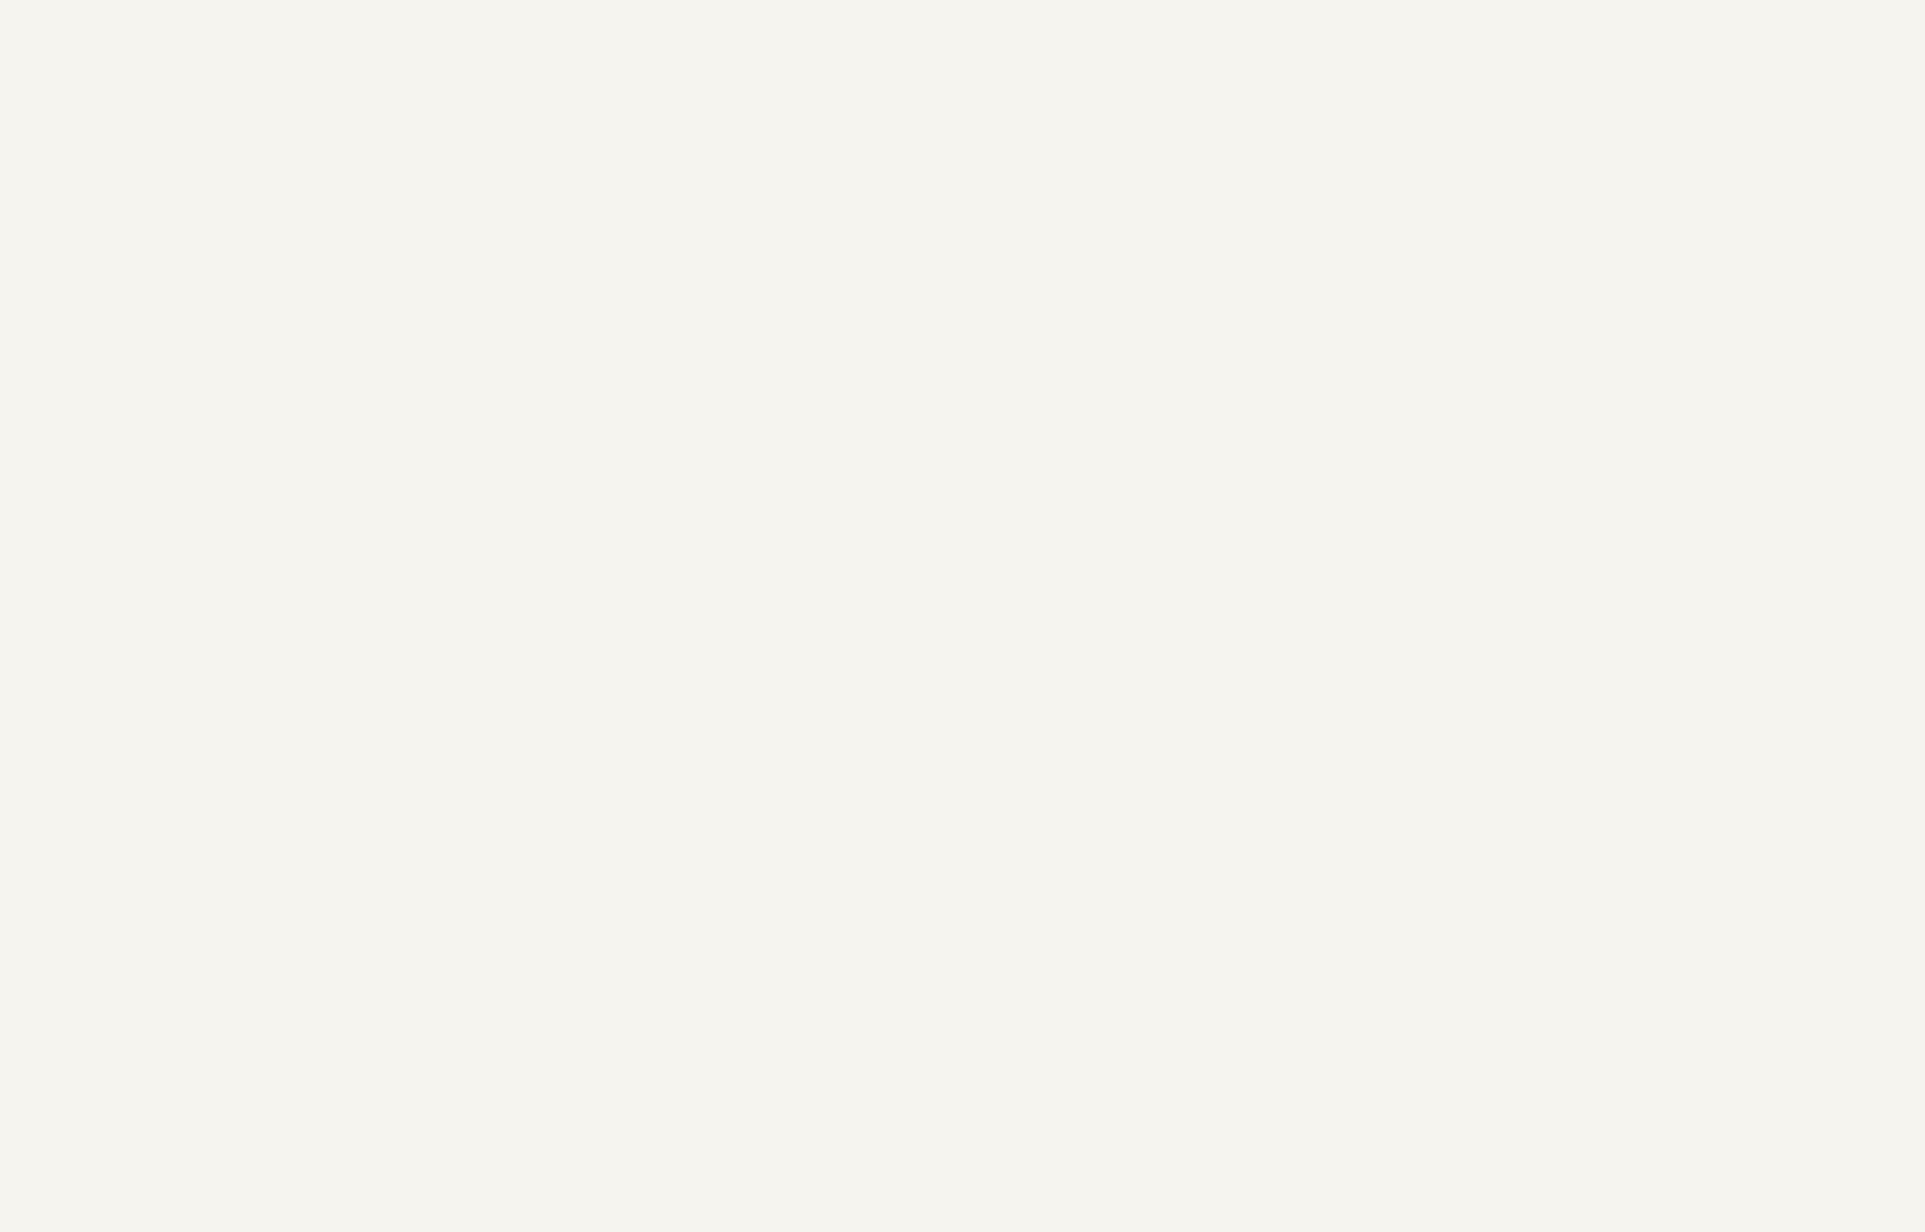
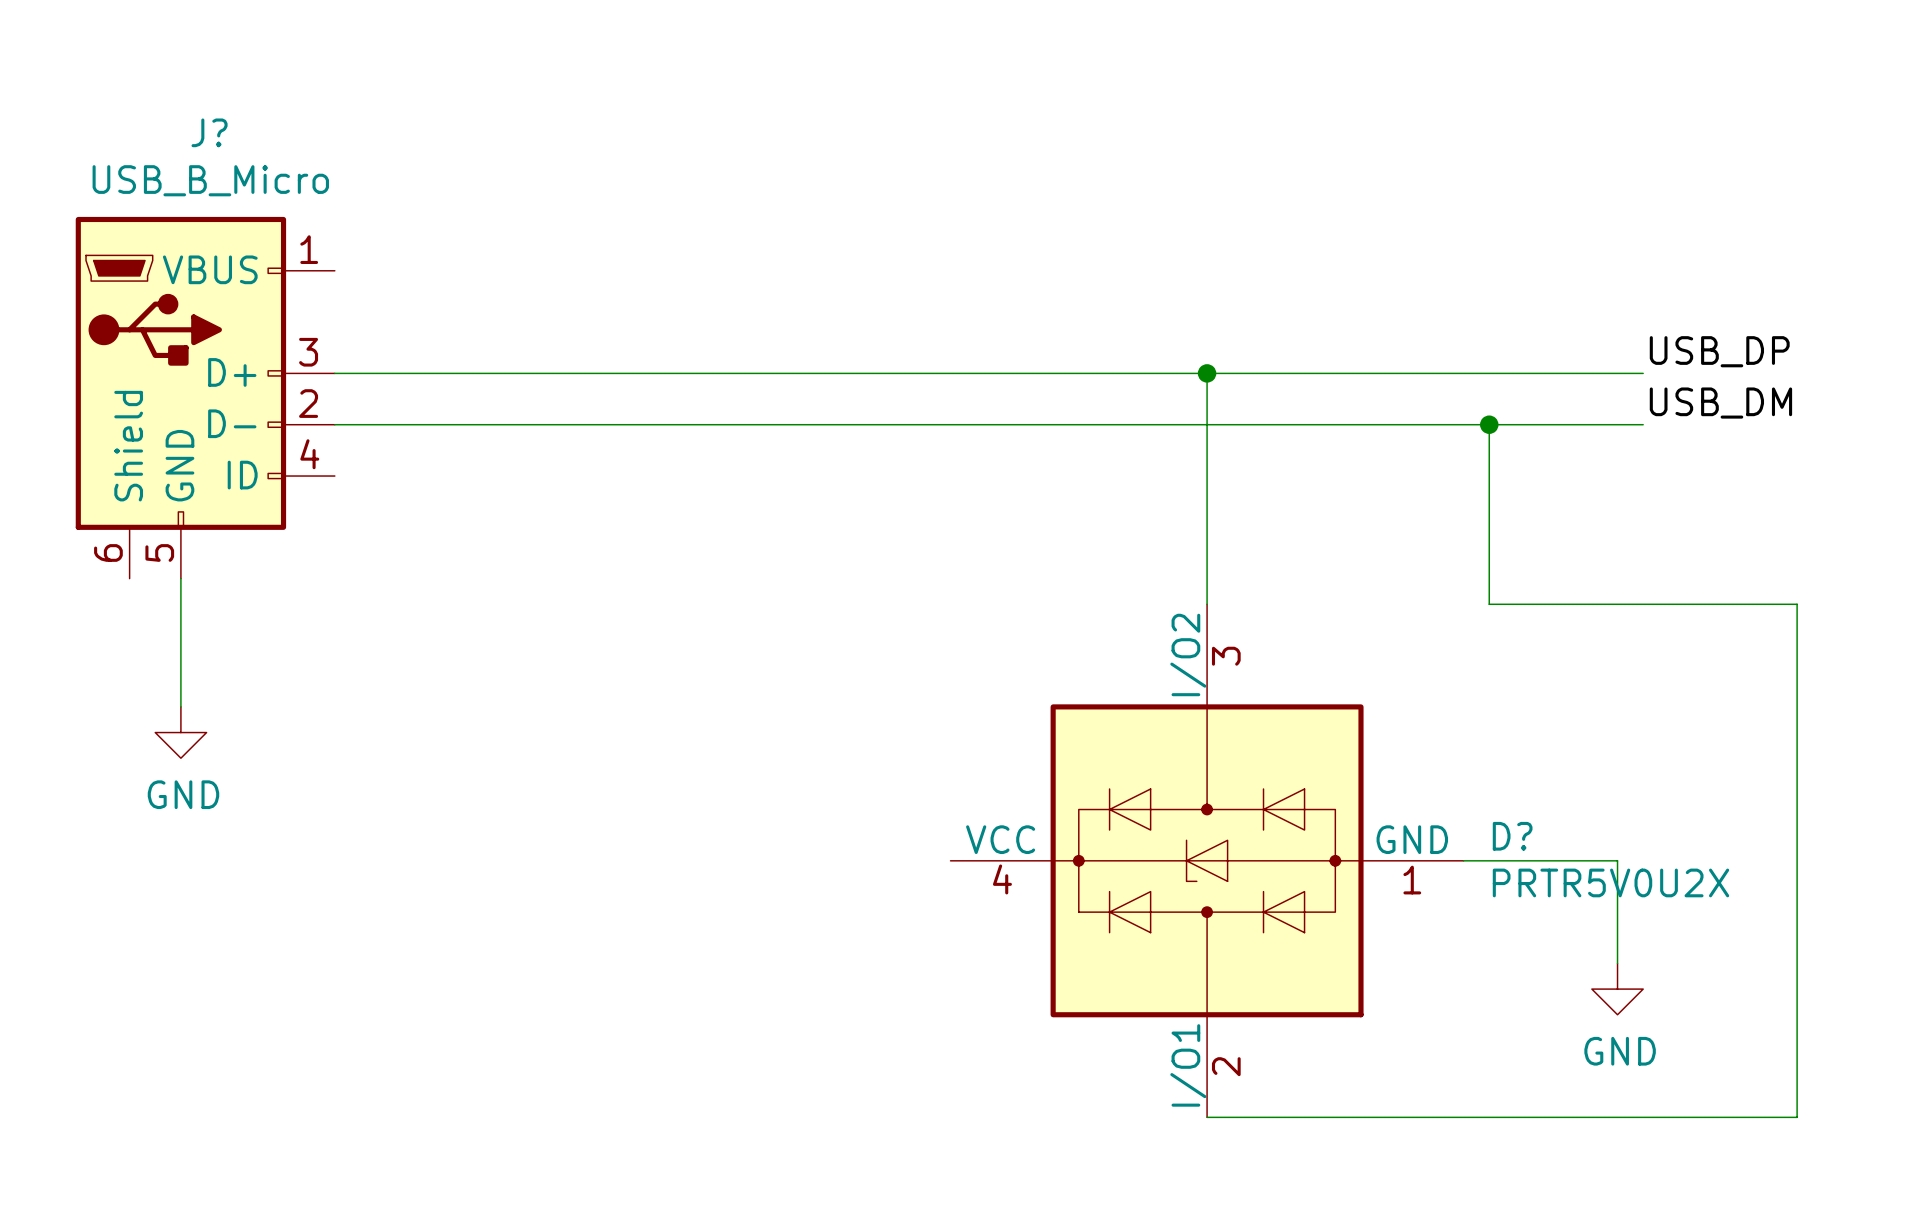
label: none -> USB_DP (1719, 351)
wire: none -> (334, 373) (1643, 373)
wire: none -> (1207, 373) (1207, 604)
junction: none -> (1207, 373)
J?: none -> USB_B_Micro (205, 397)
label: none -> USB_DM (1720, 403)
wire: none -> (334, 424) (1643, 424)
wire: none -> (1489, 424) (1489, 604) (1797, 604) (1797, 1117) (1207, 1117)
junction: none -> (1489, 424)
wire: none -> (180, 578) (180, 706)
power symbol: none -> GND (180, 732)
D?: none -> PRTR5V0U2X (1207, 860)
wire: none -> (1463, 860) (1617, 860) (1617, 963)
power symbol: none -> GND (1617, 989)

